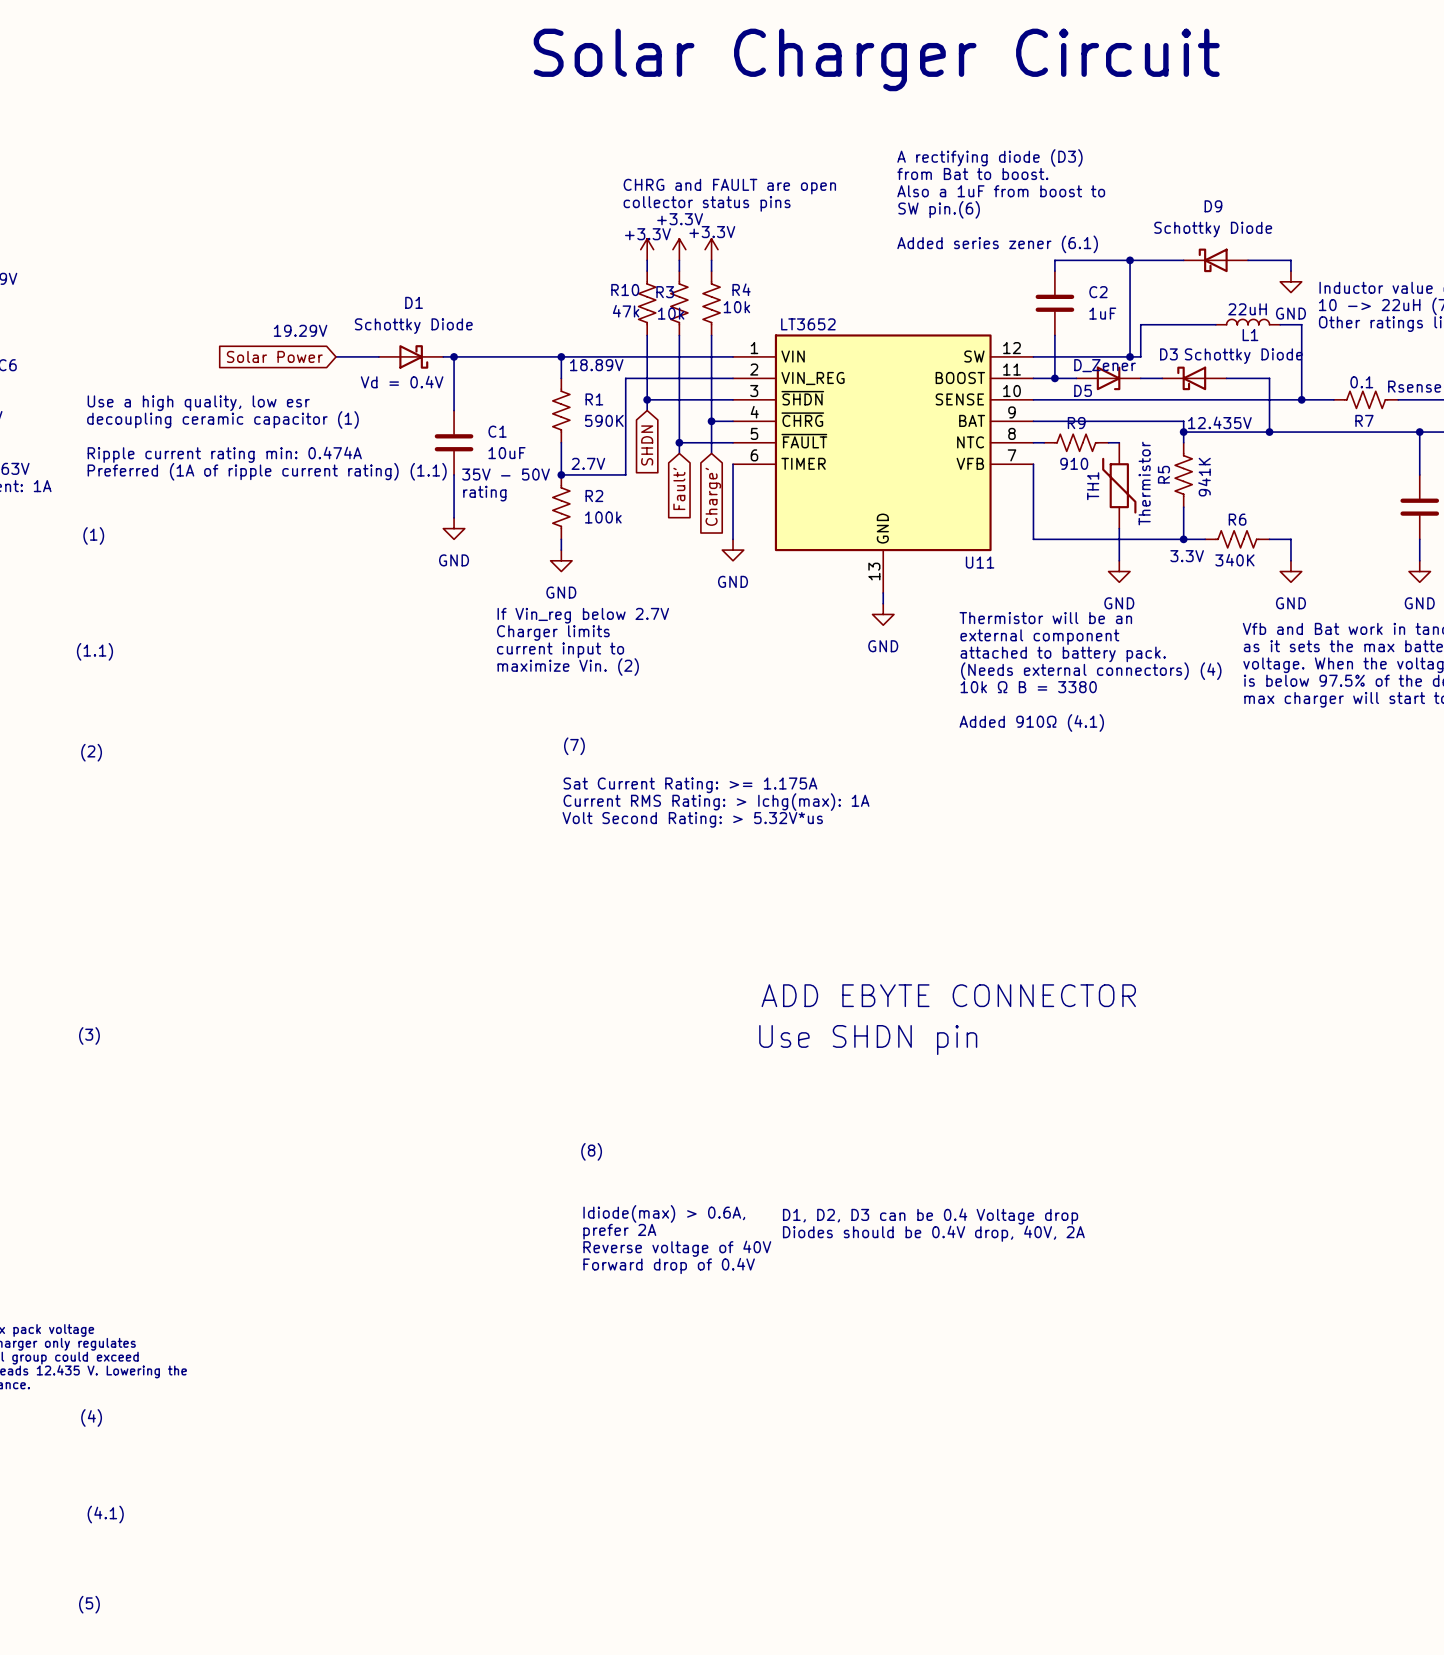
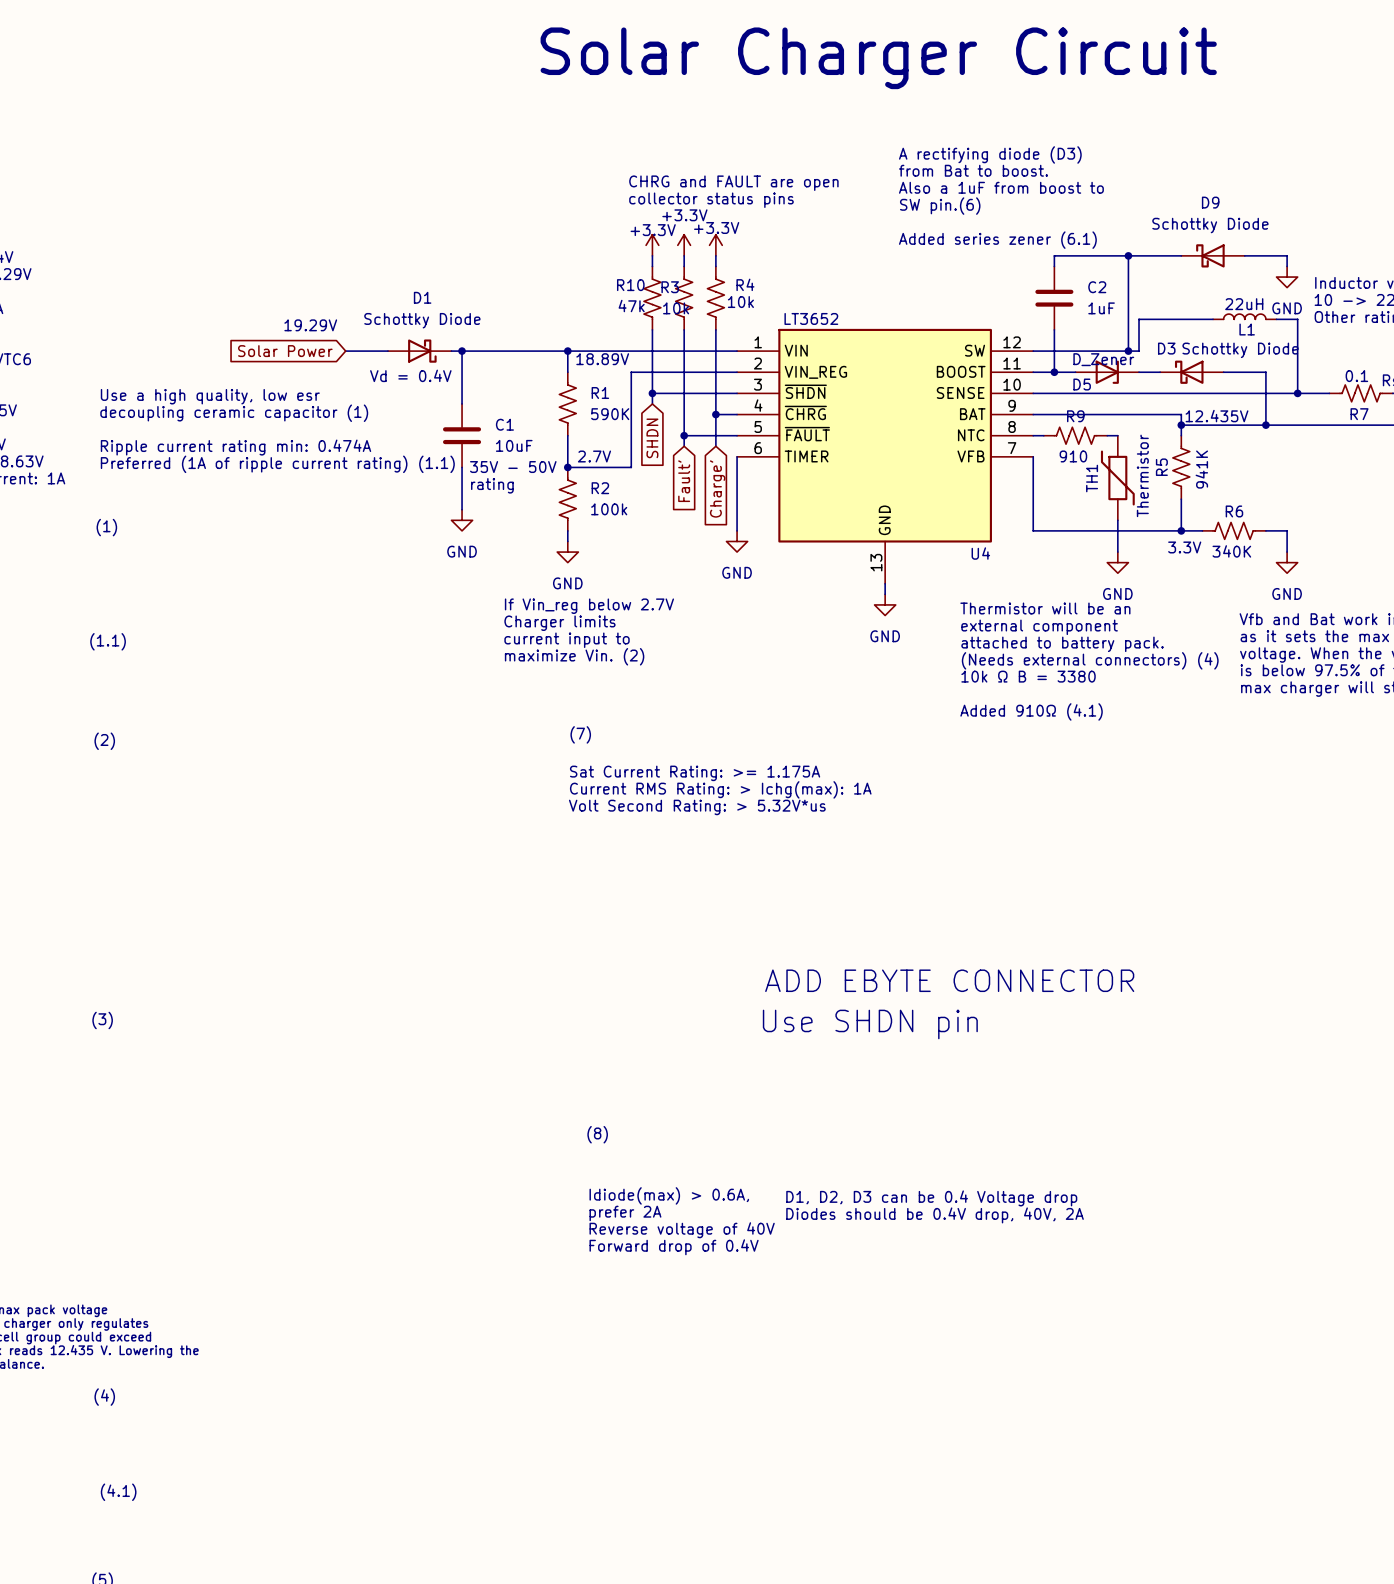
U11 name: U11 (980, 562) -> U4 (980, 553)

